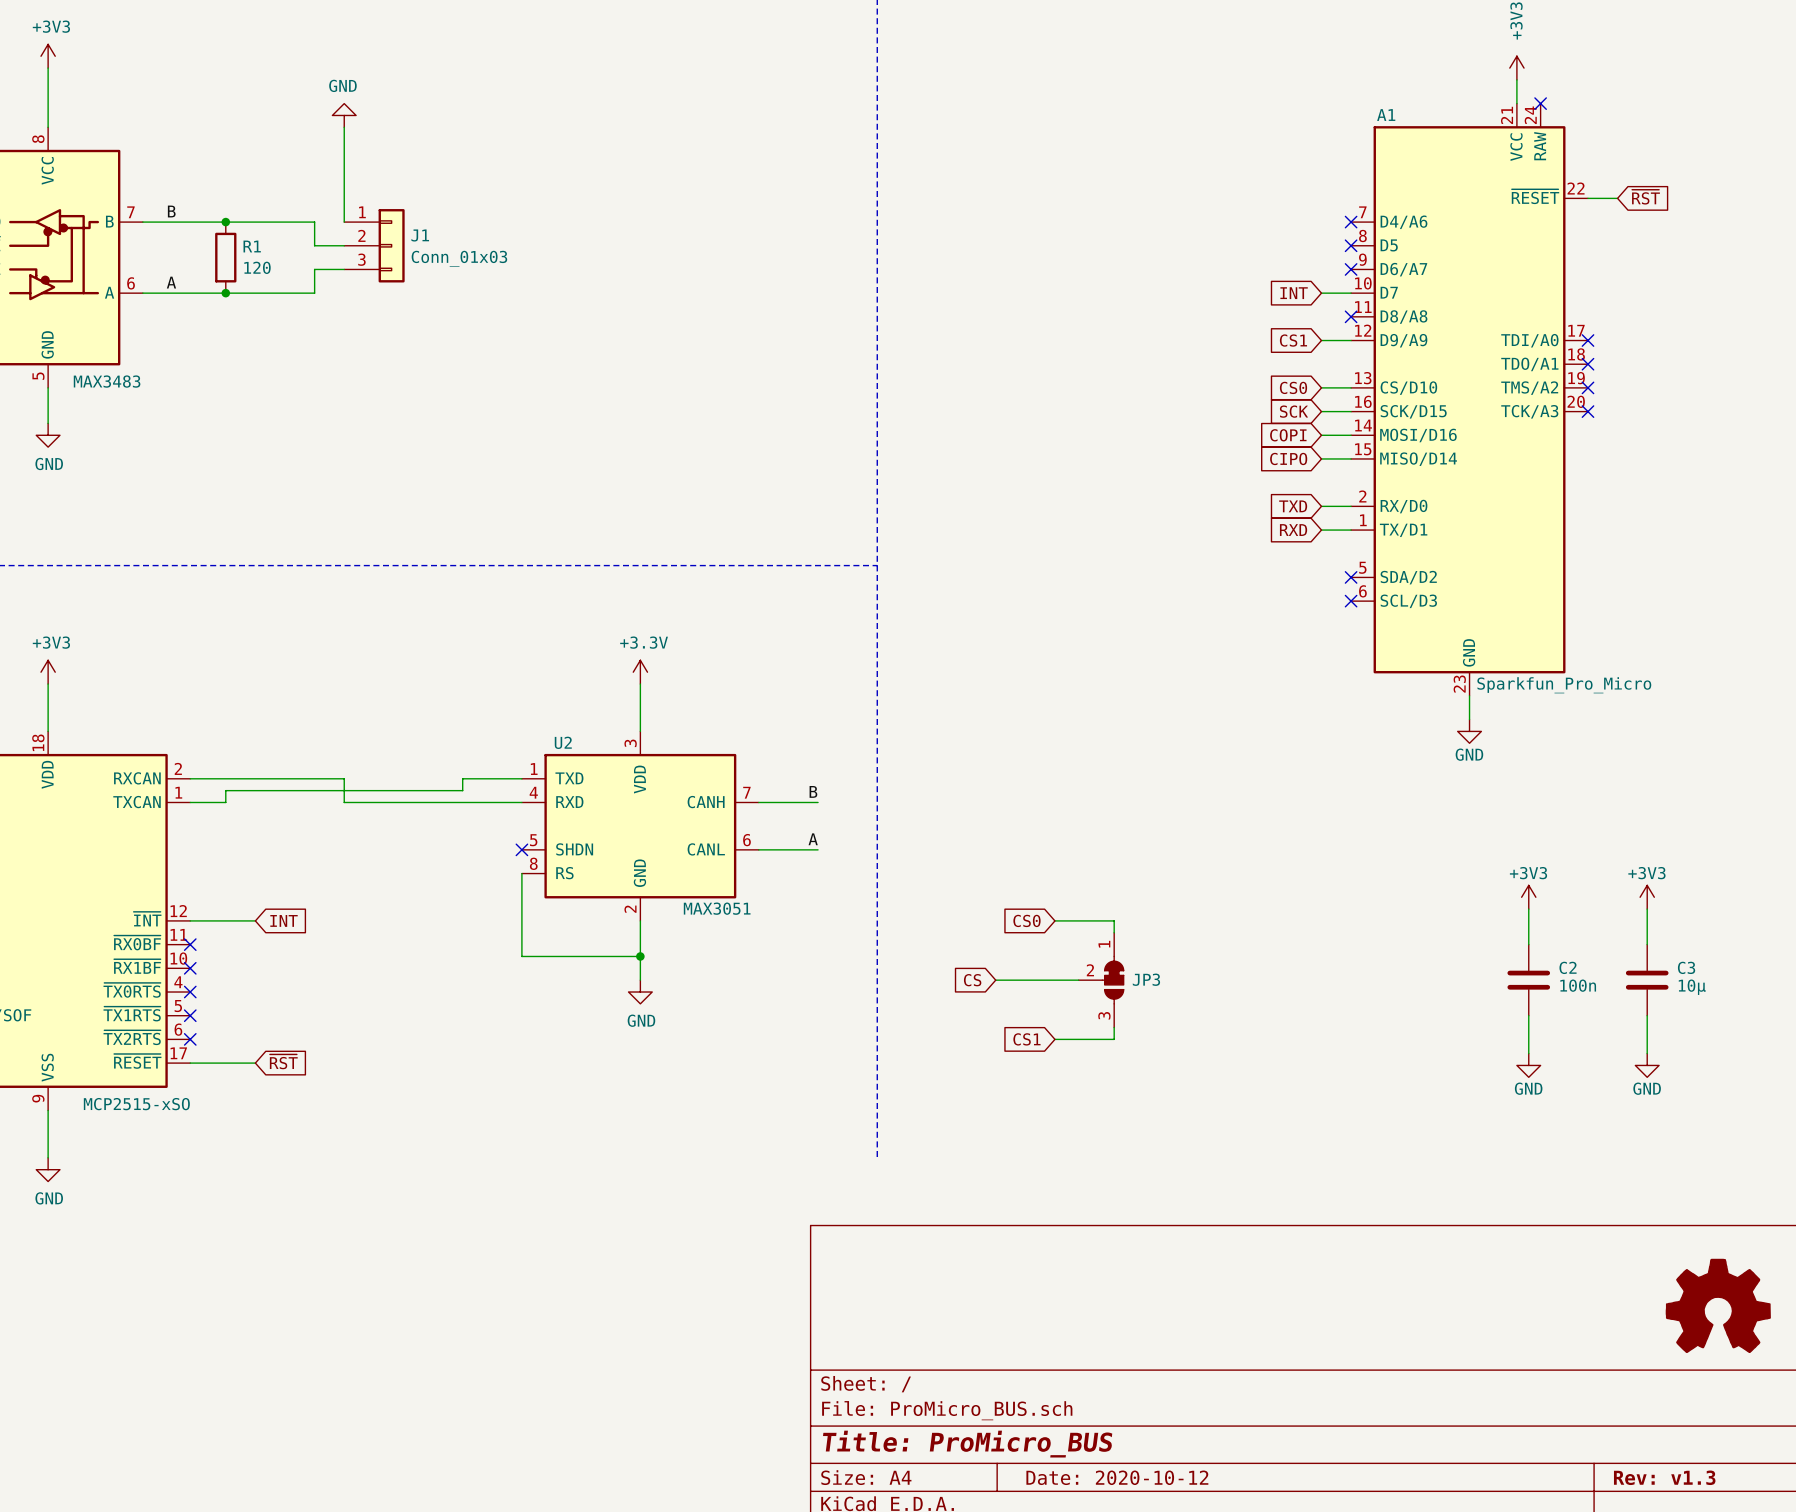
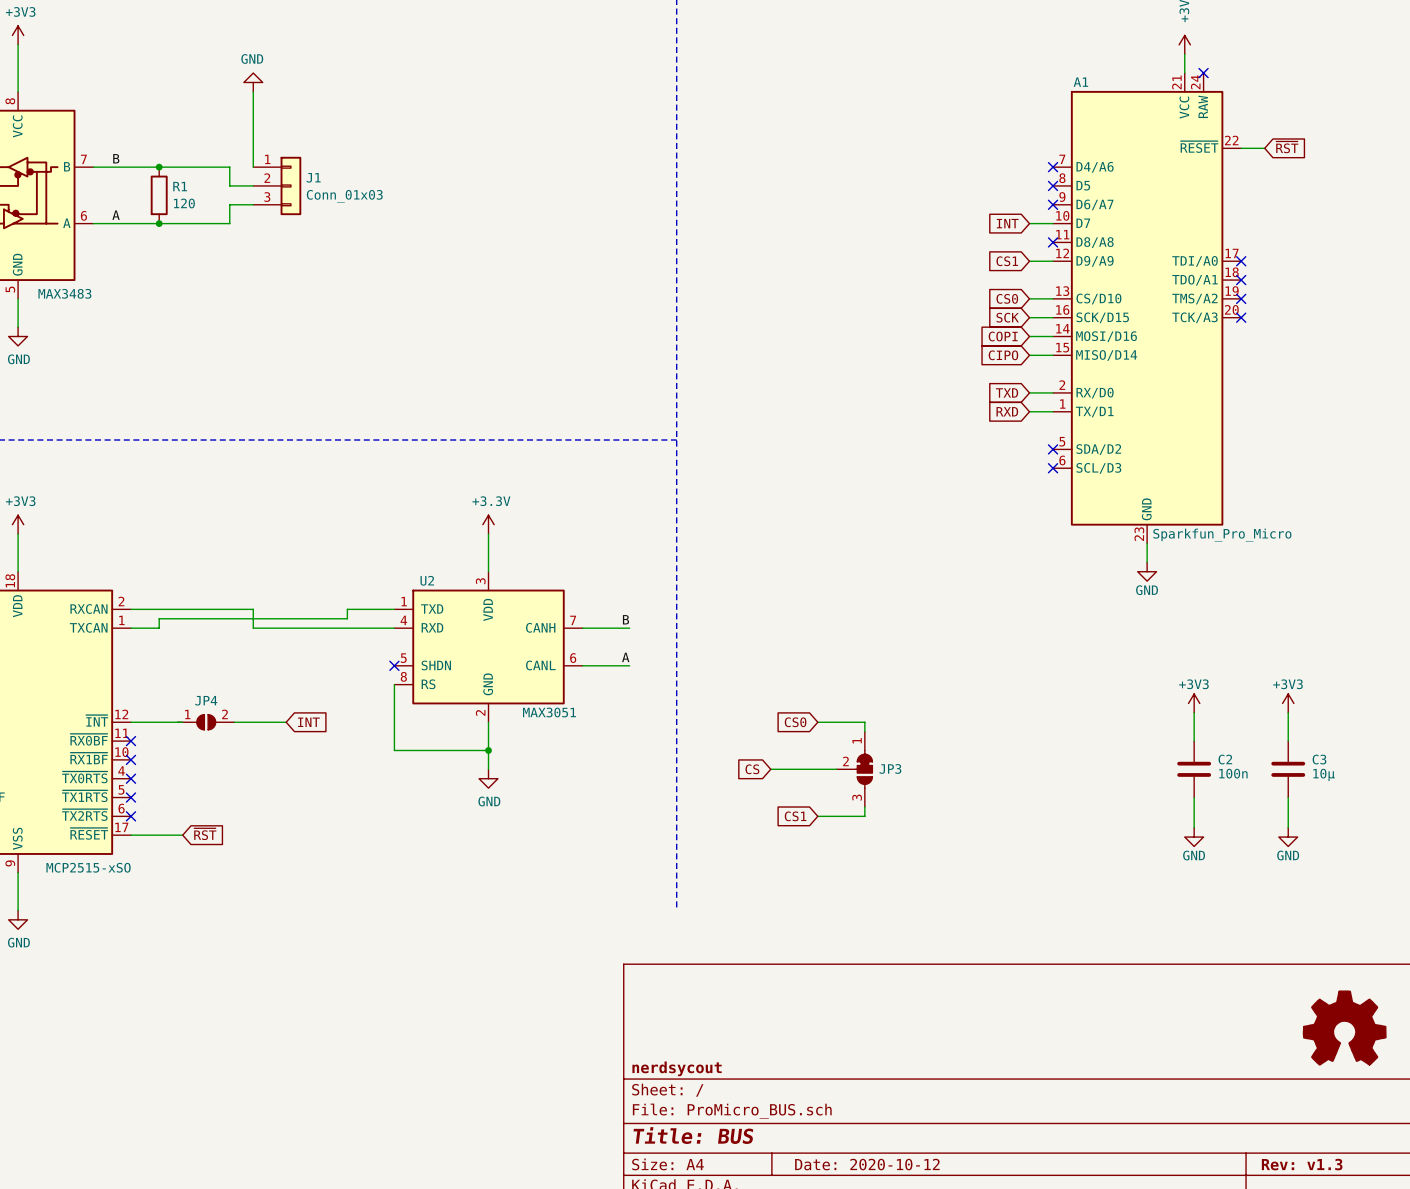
global label position: INT (284, 920) -> INT (308, 722)
JP4: none -> (206, 722)
wire: none -> (234, 722) (286, 722)
title block: none -> nerdsycout (677, 1068)
title block: Title: ProMicro_BUS (967, 1444) -> Title: BUS (693, 1135)

